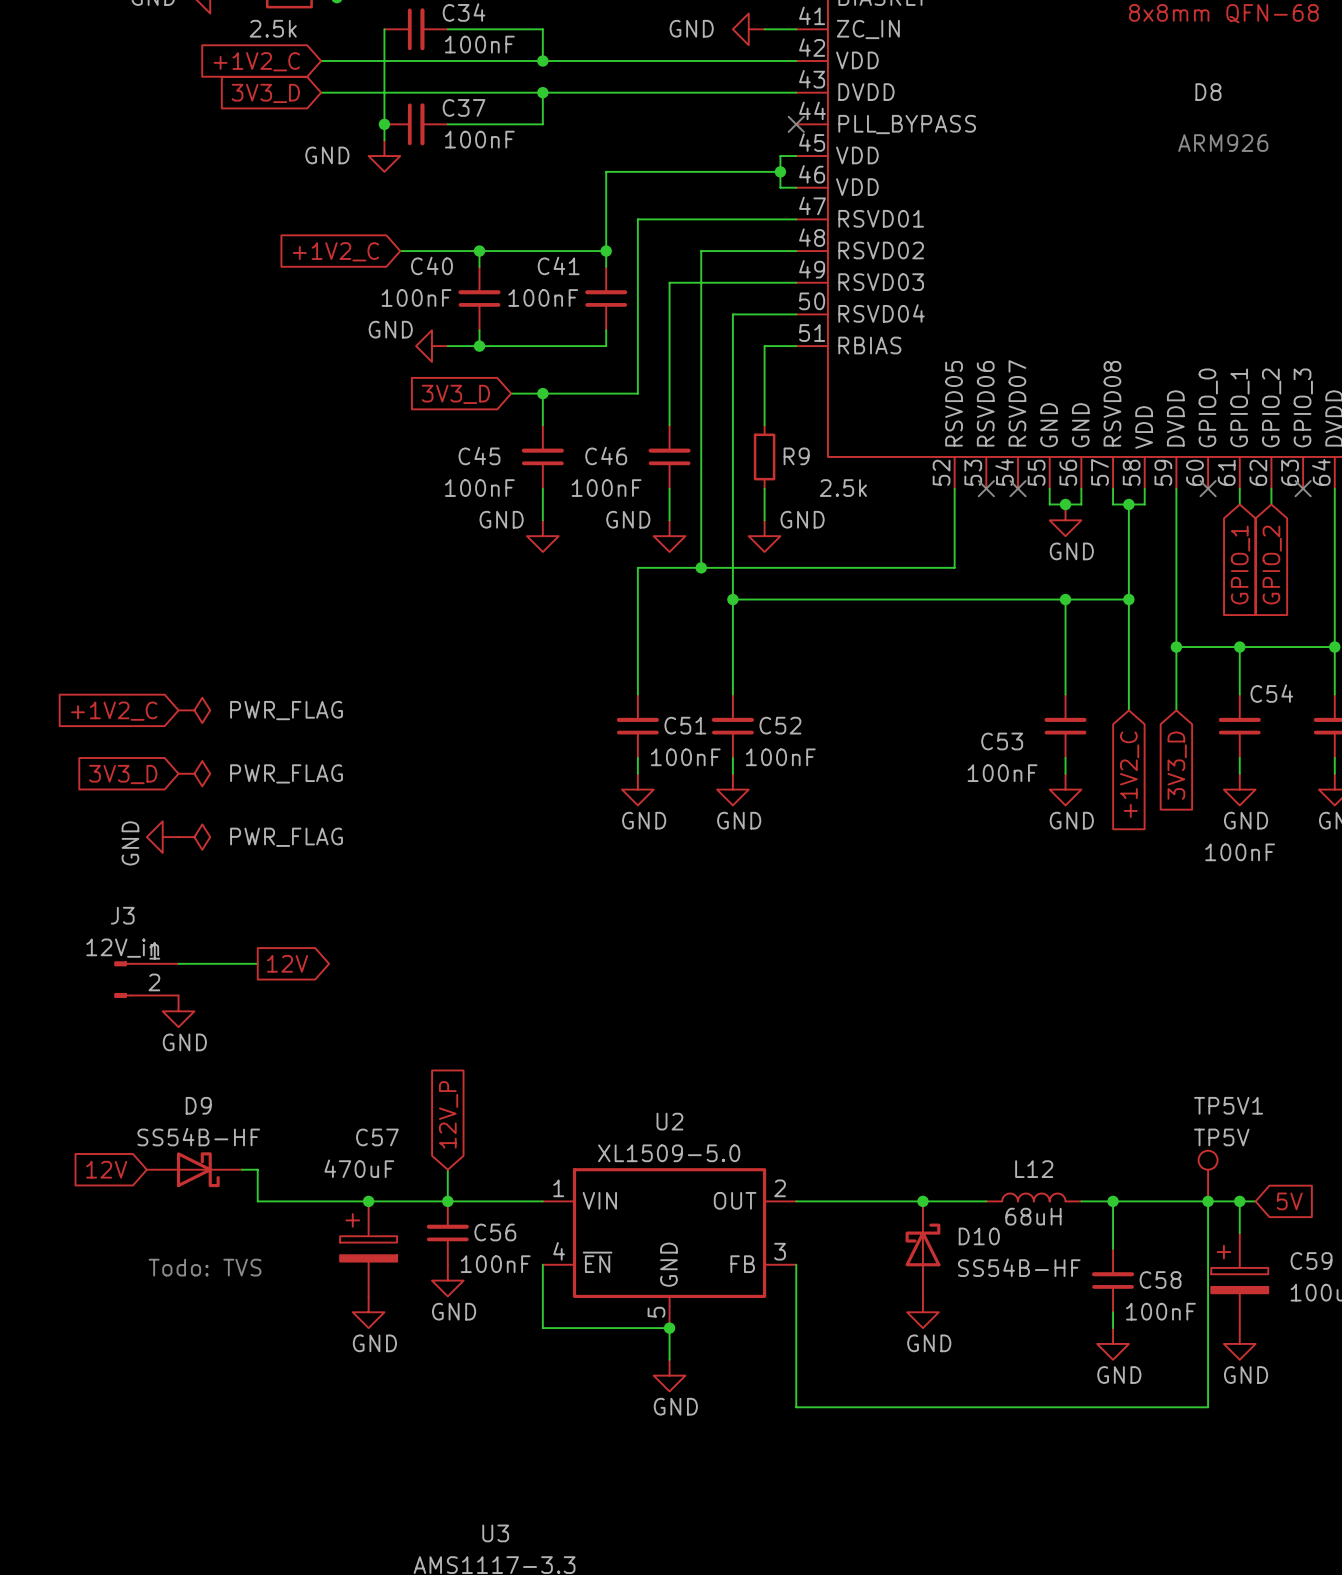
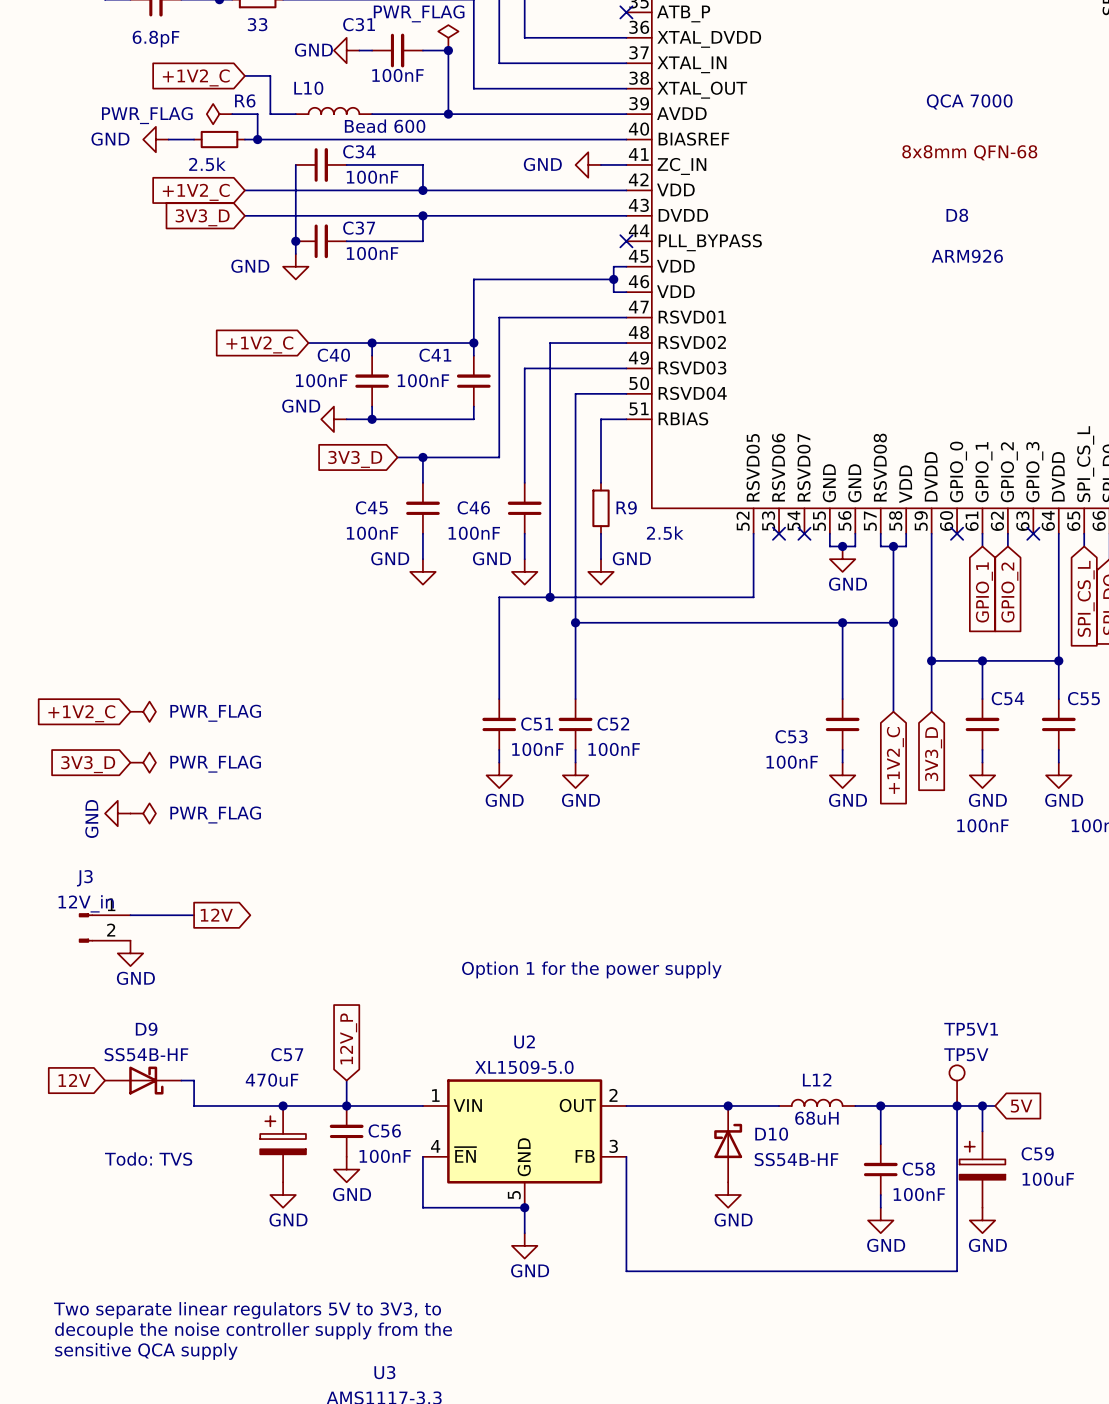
text: none -> Option 1 for the power supply (591, 969)
text: none -> Two separate linear regulators 5V to 3V3, to (247, 1310)
text: none -> decouple the noise controller supply from the (253, 1330)
text: none -> sensitive QCA supply (146, 1351)

